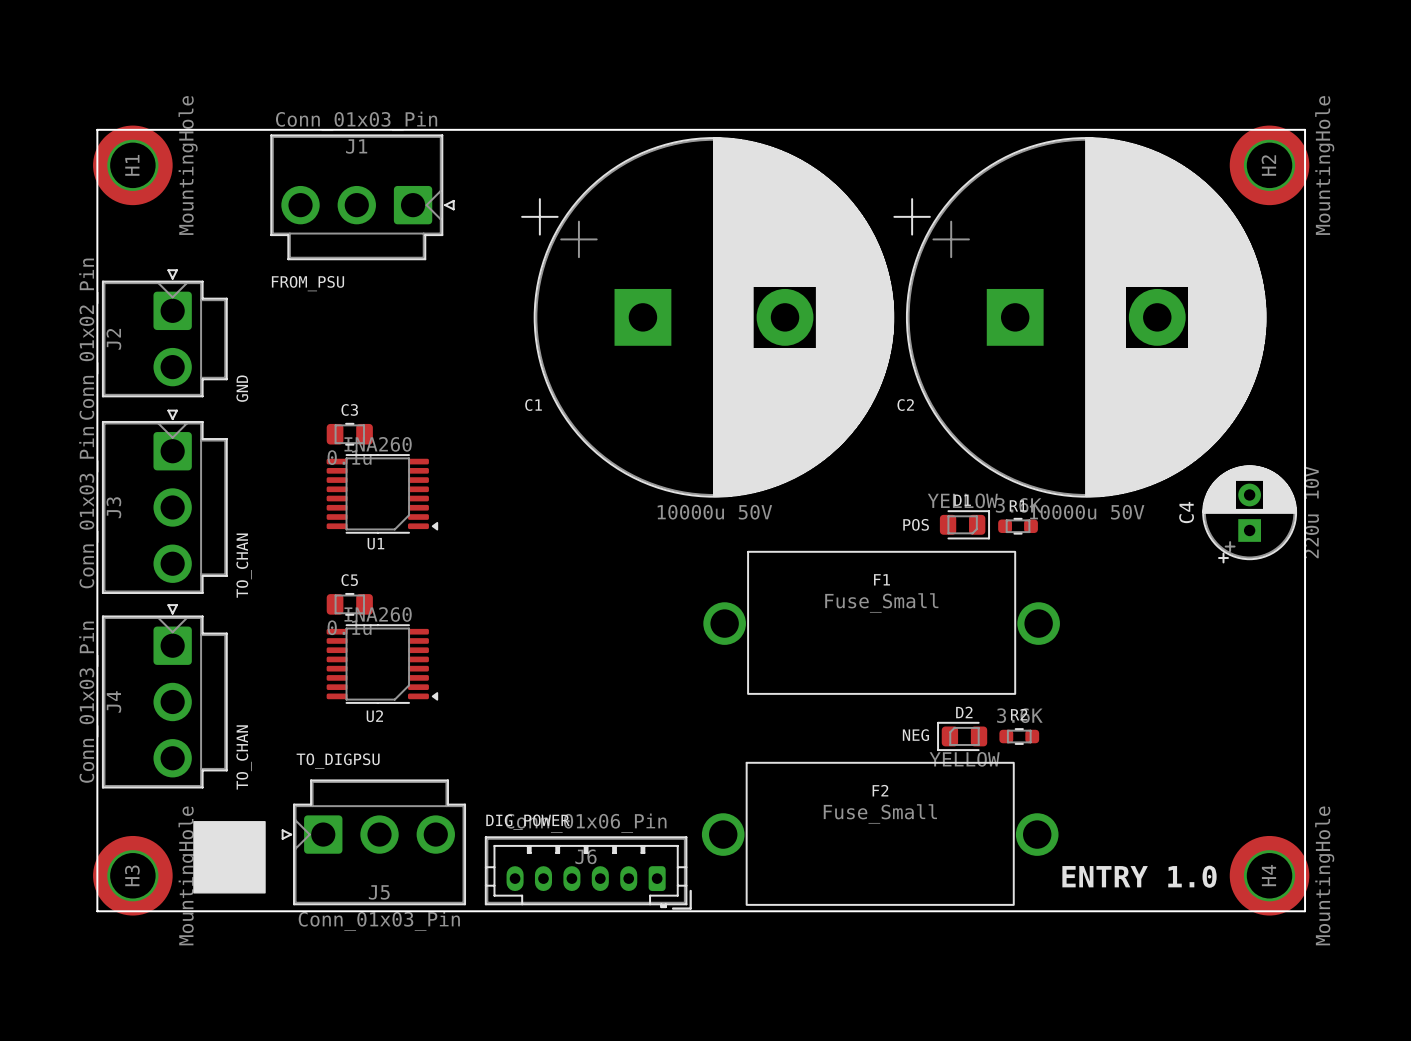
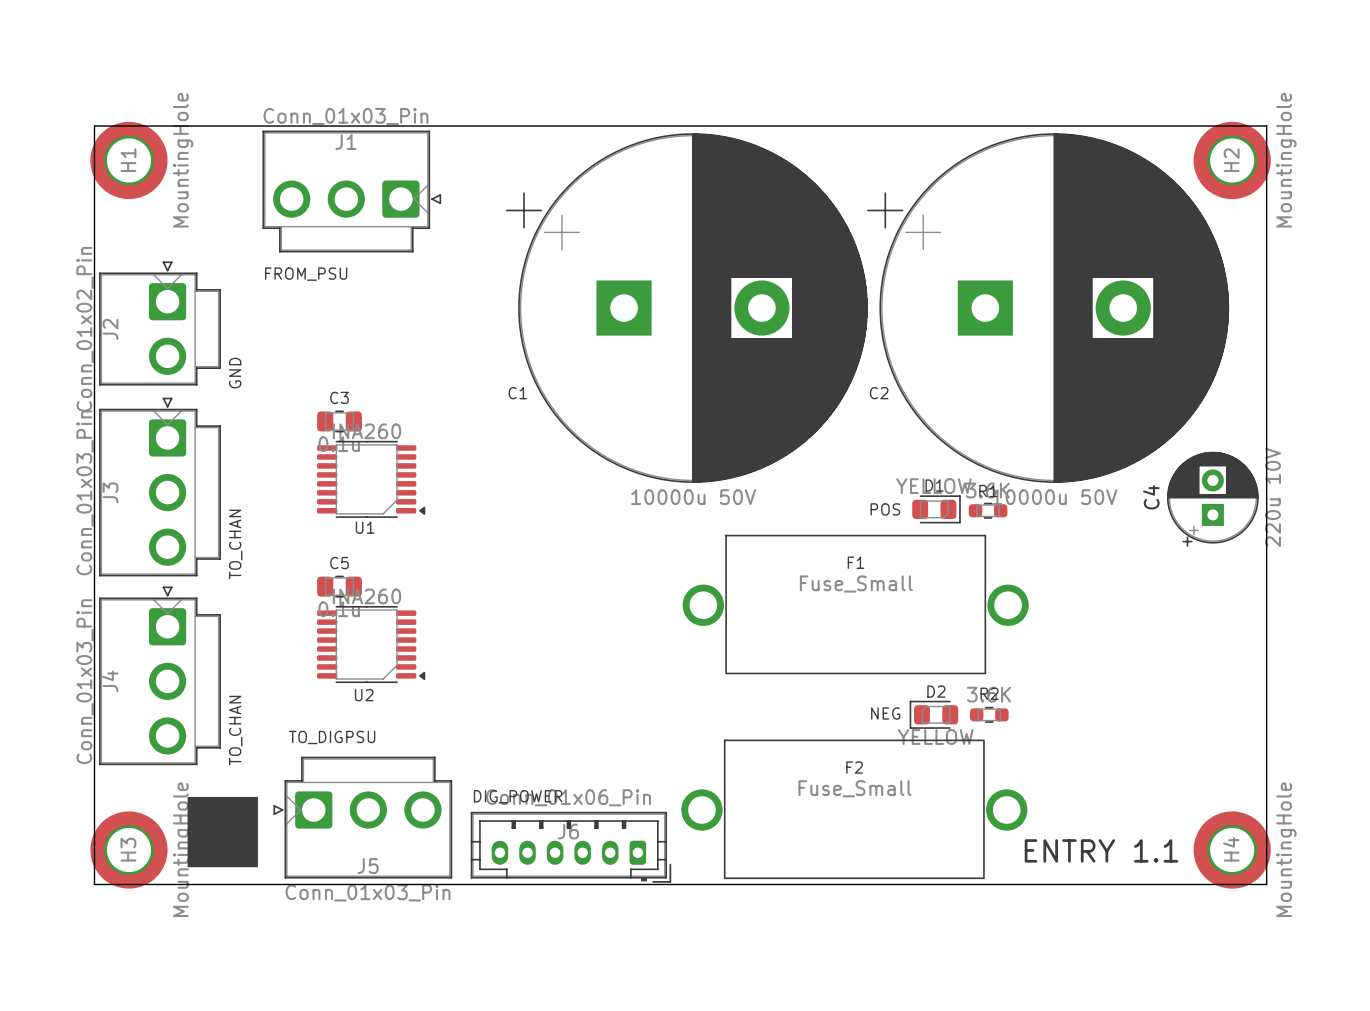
text: ENTRY 1.0 (1139, 876) -> ENTRY 1.1 (1101, 850)

